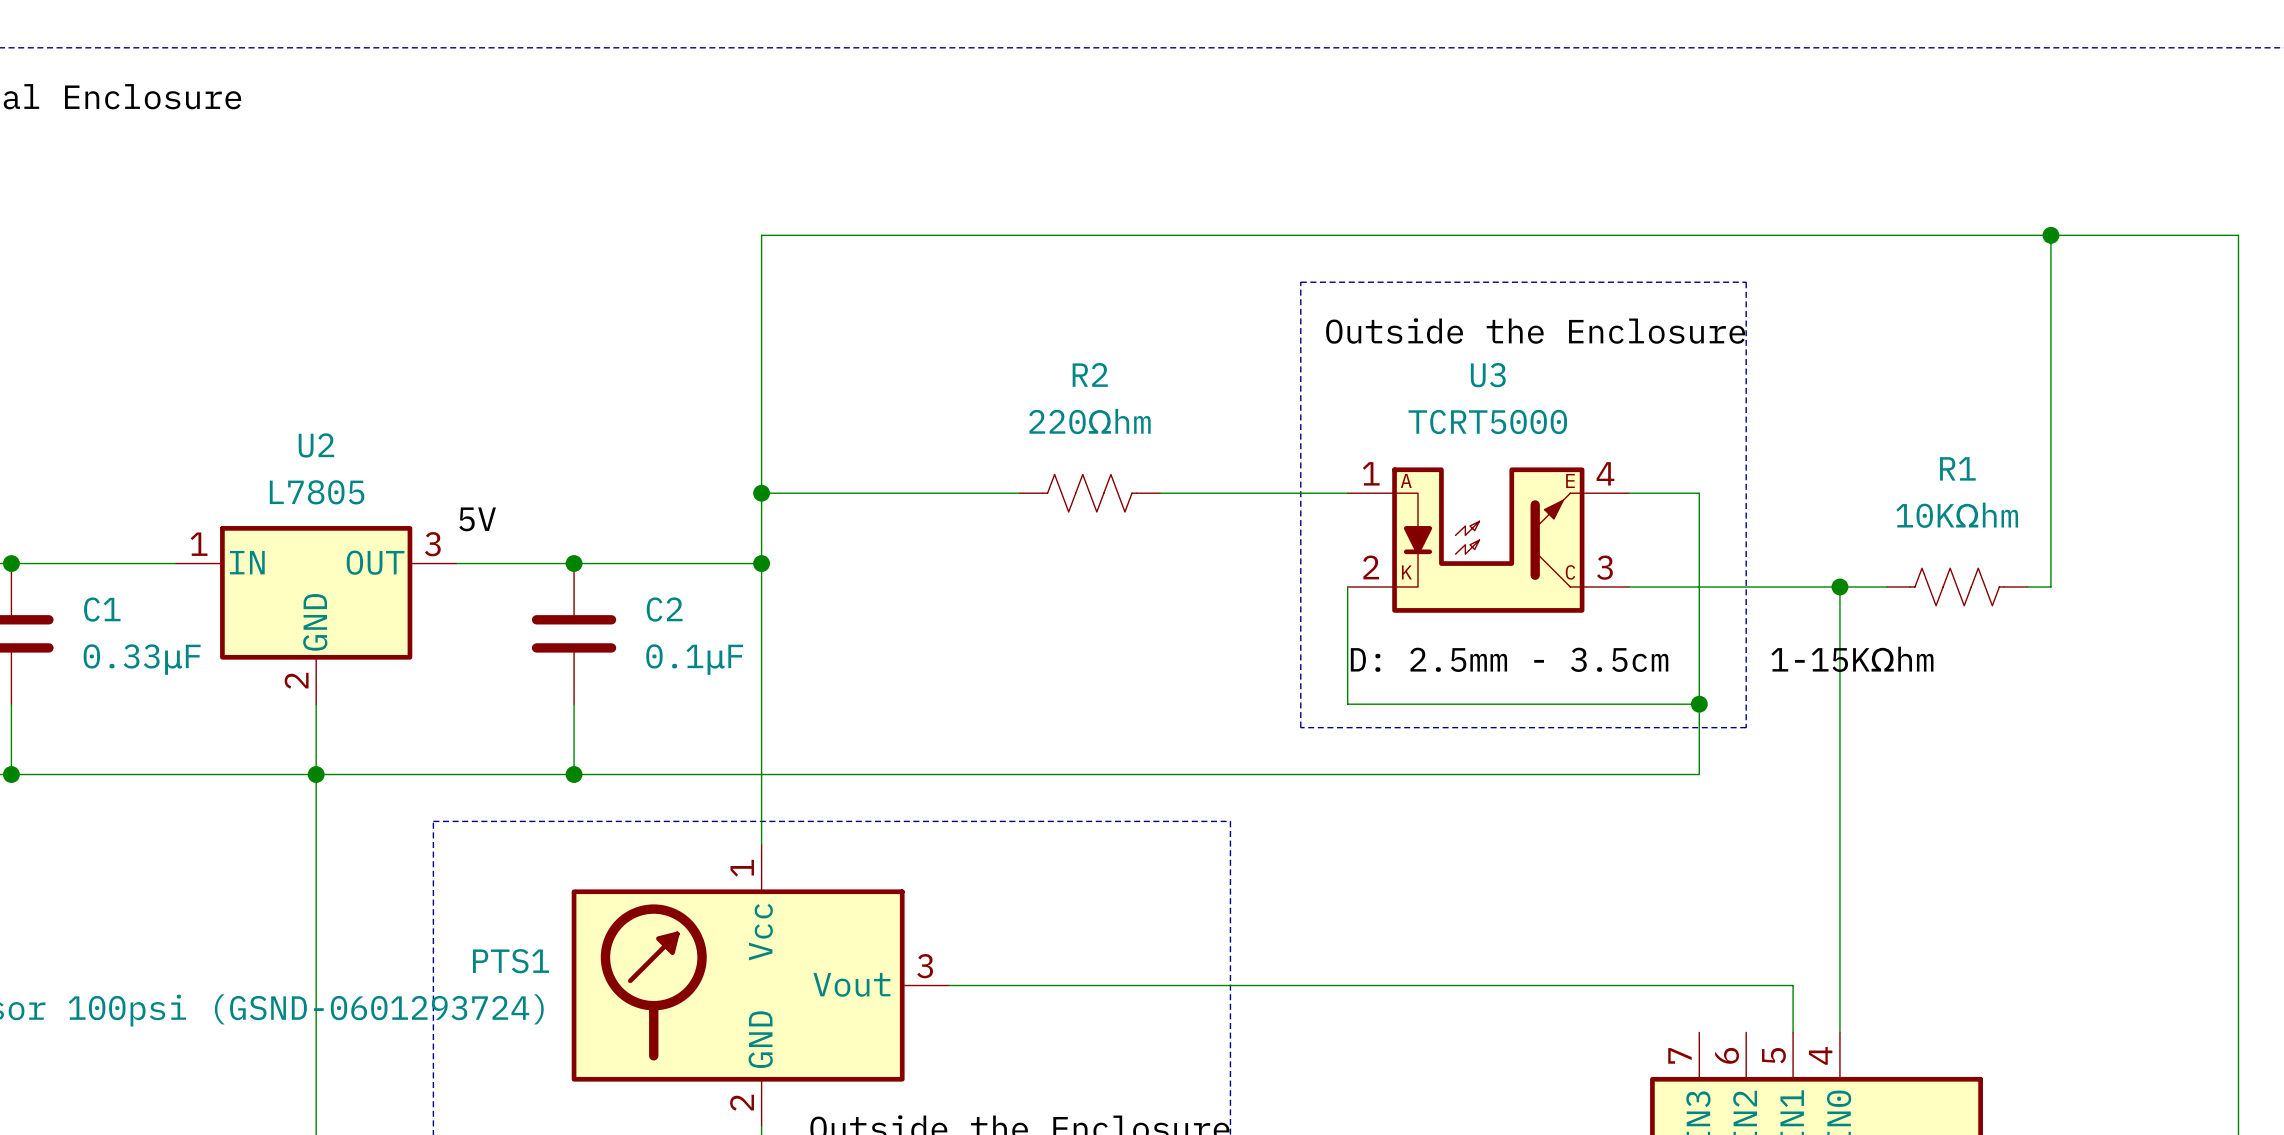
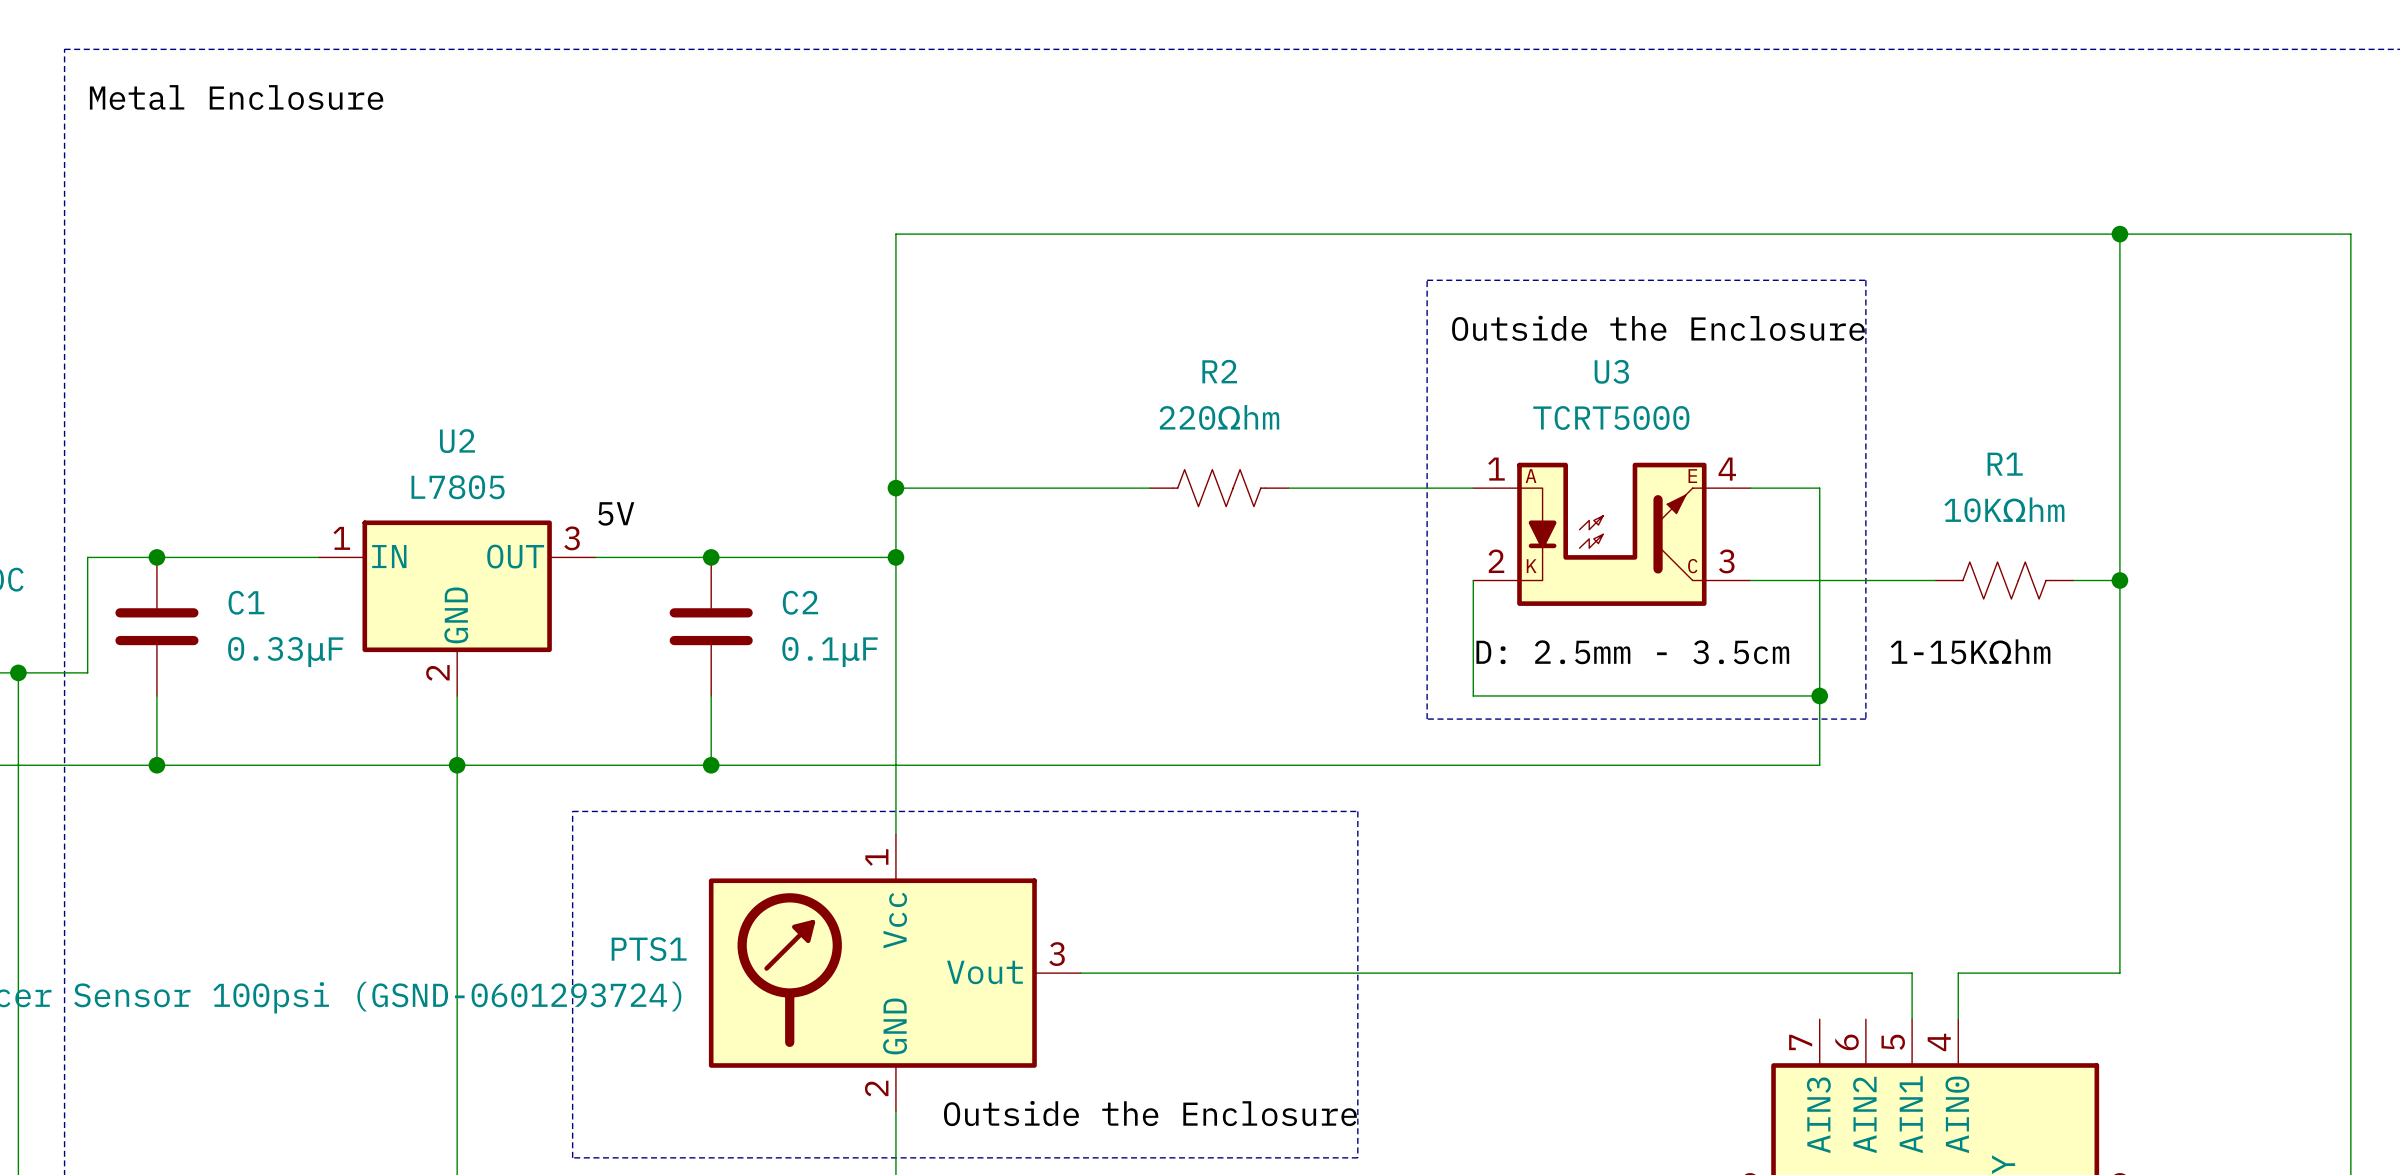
wire: (2050, 235) (2050, 586) (2027, 586) -> none
junction position: (2050, 235) -> (2119, 234)
wire: (1816, 586) (1886, 586) -> none
wire: (1839, 586) (1839, 985) -> (2119, 234) (2119, 973) (1958, 973)
junction: (1839, 586) -> none
wire: none -> (2073, 580) (2119, 580)
R1 position: (1957, 586) -> (2004, 580)
junction: none -> (2119, 580)

